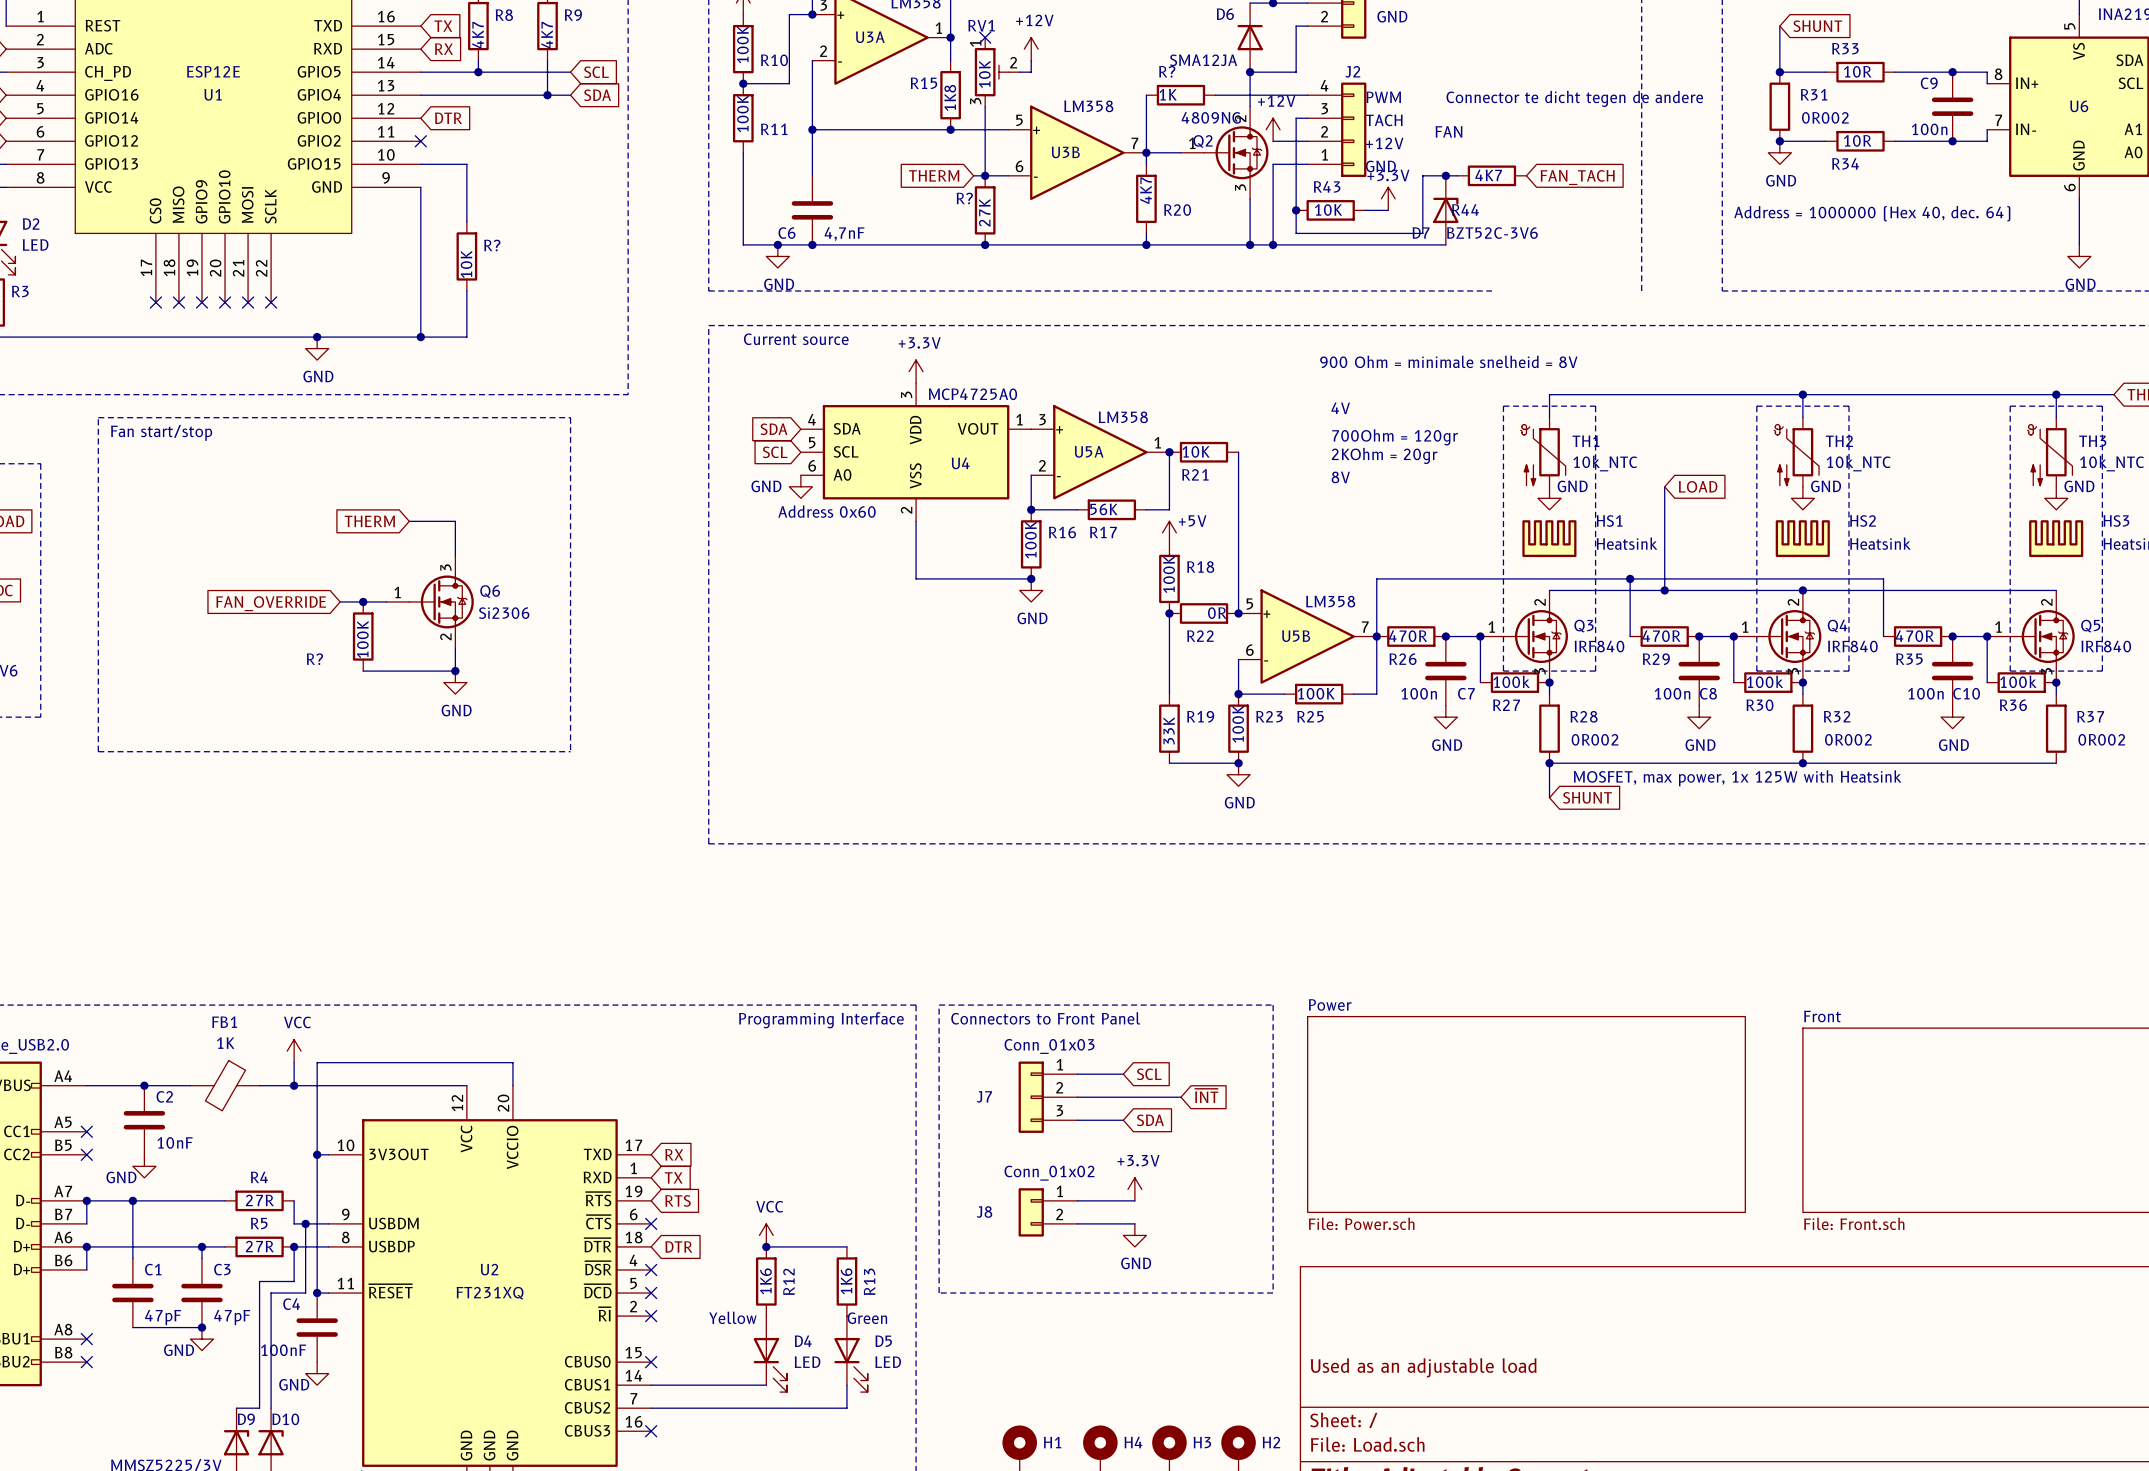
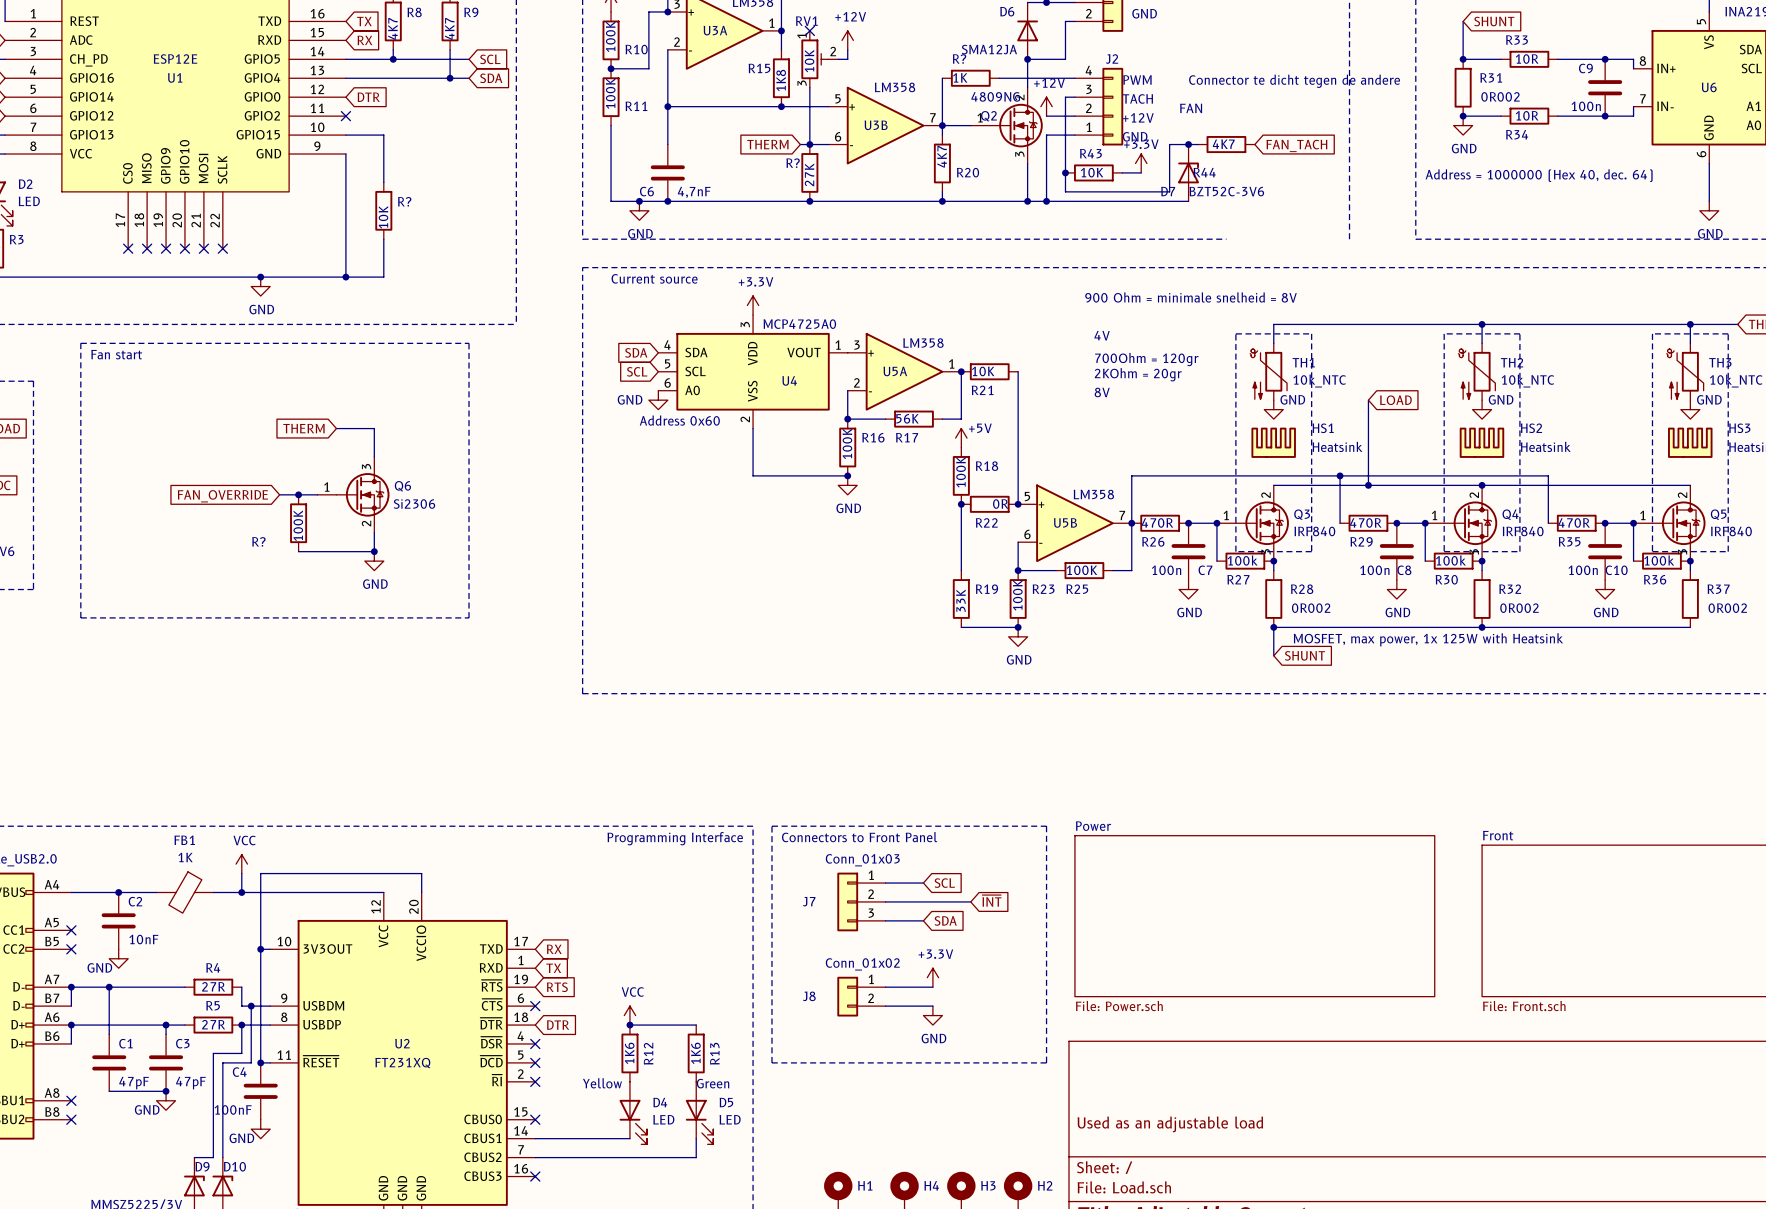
text: Fan start/stop (161, 432) -> Fan start (116, 354)

